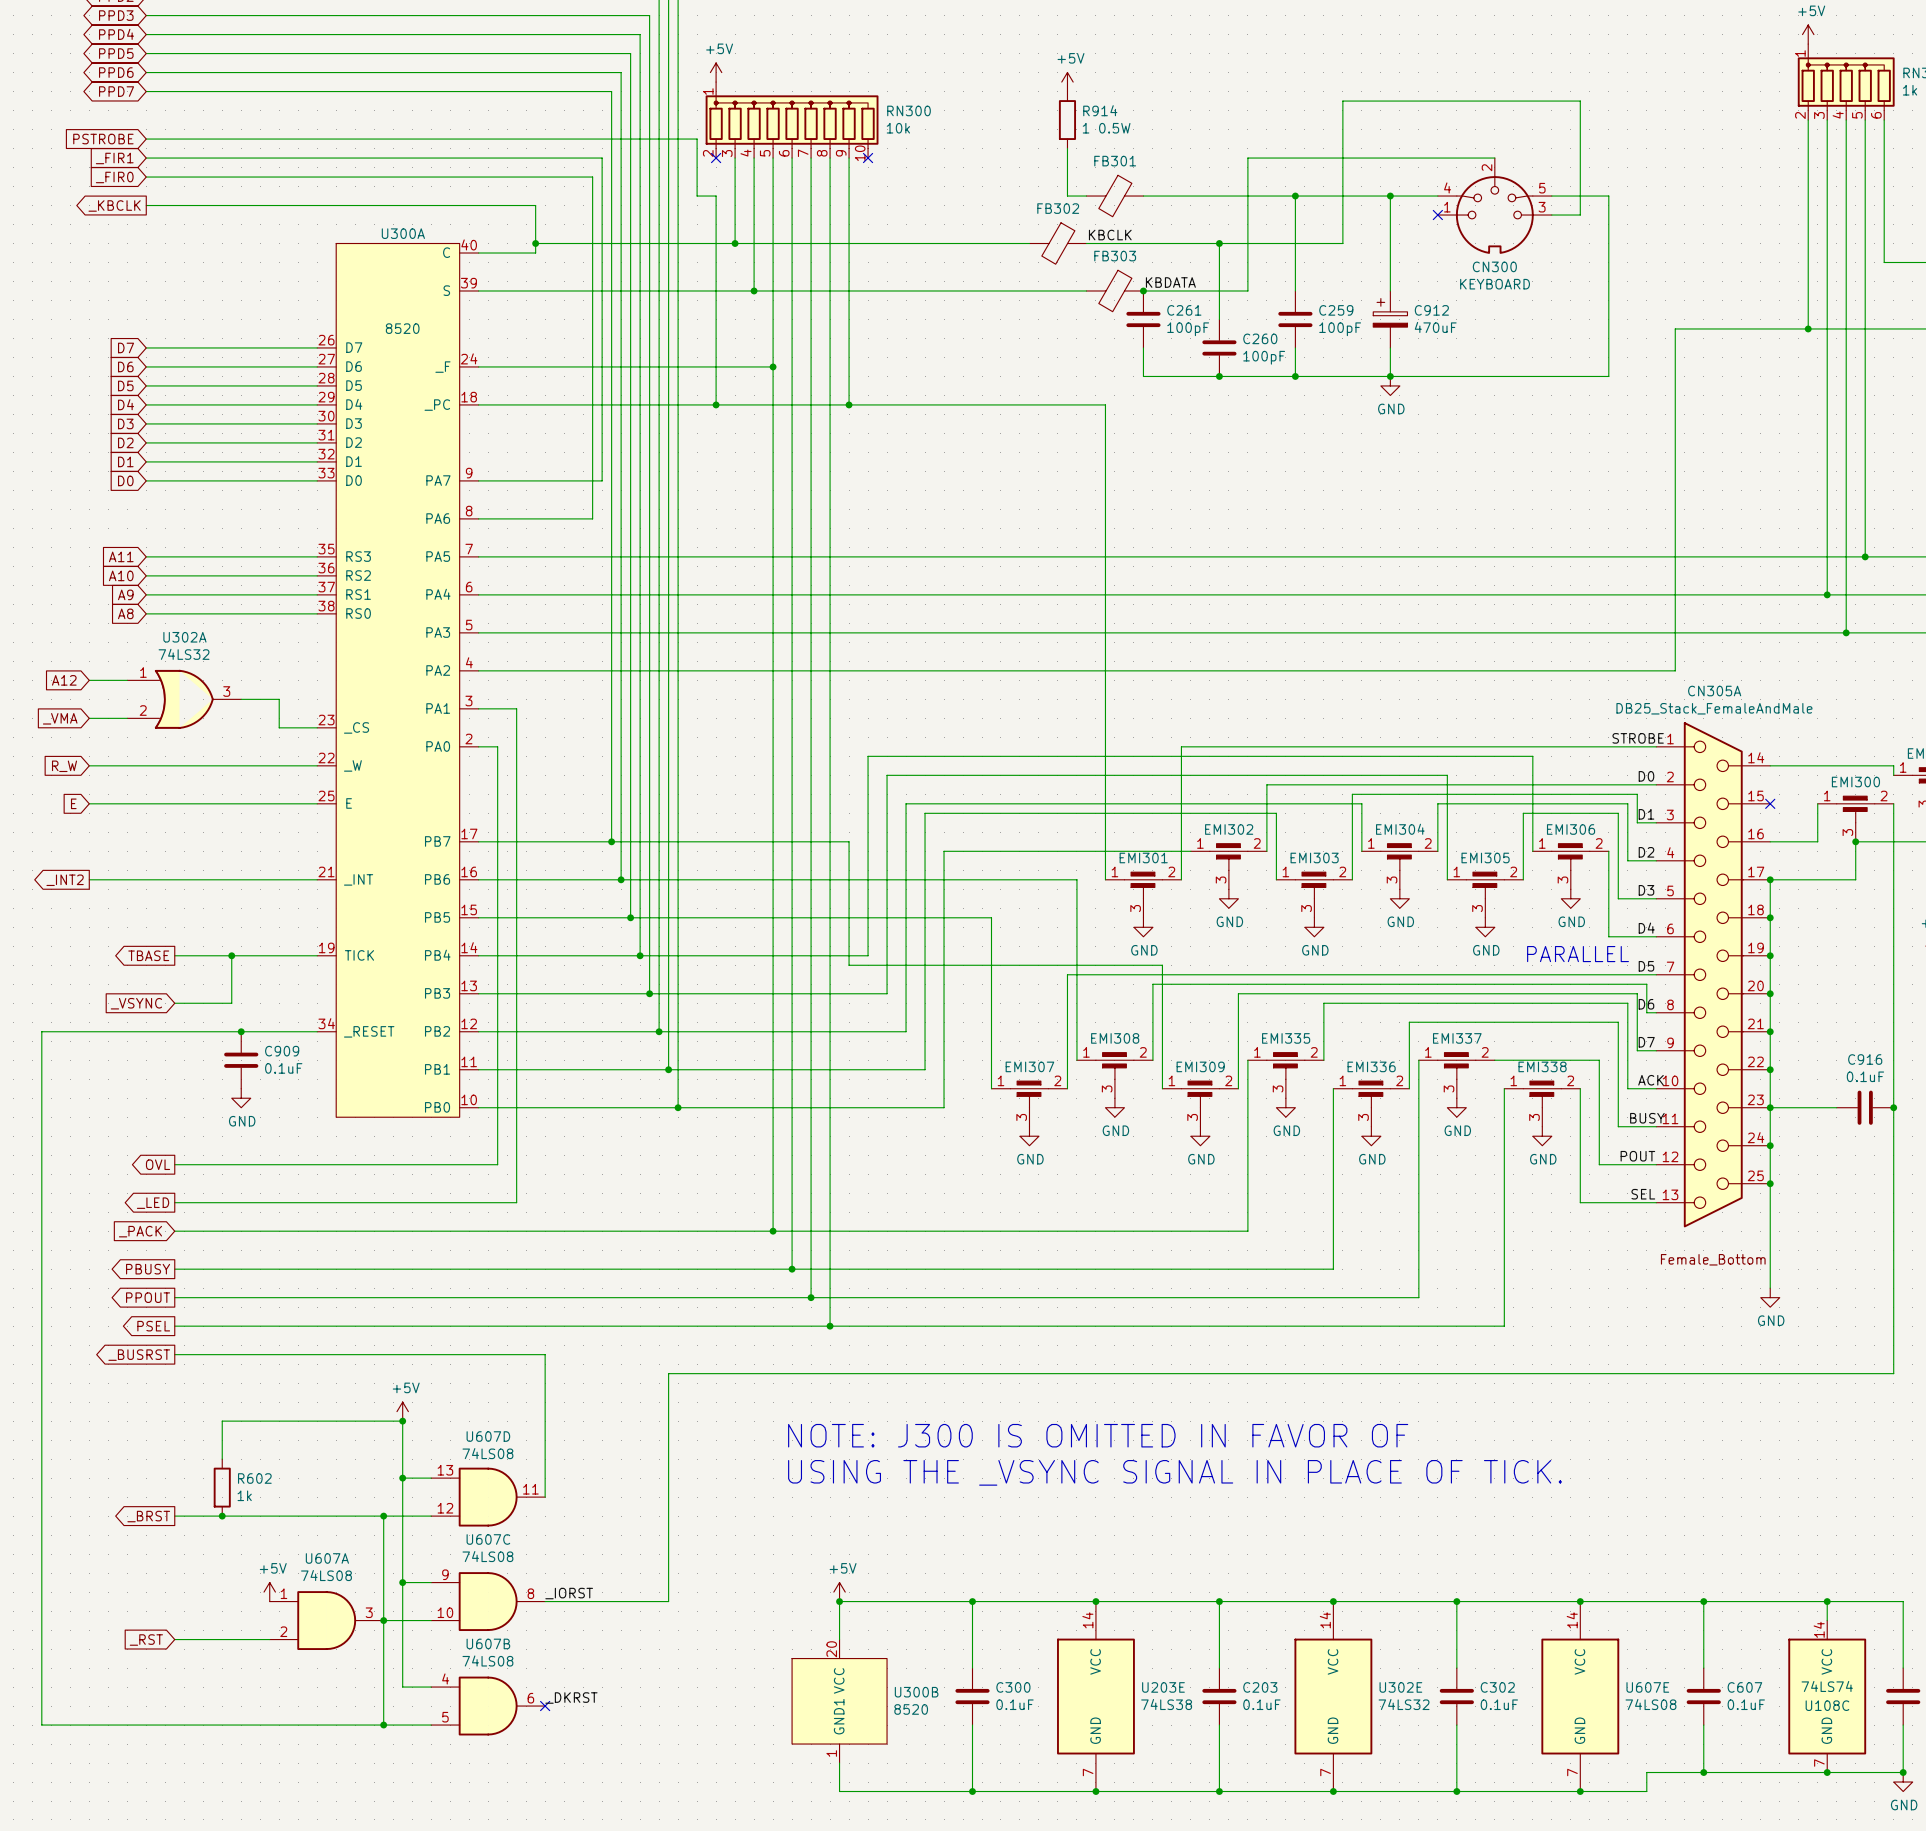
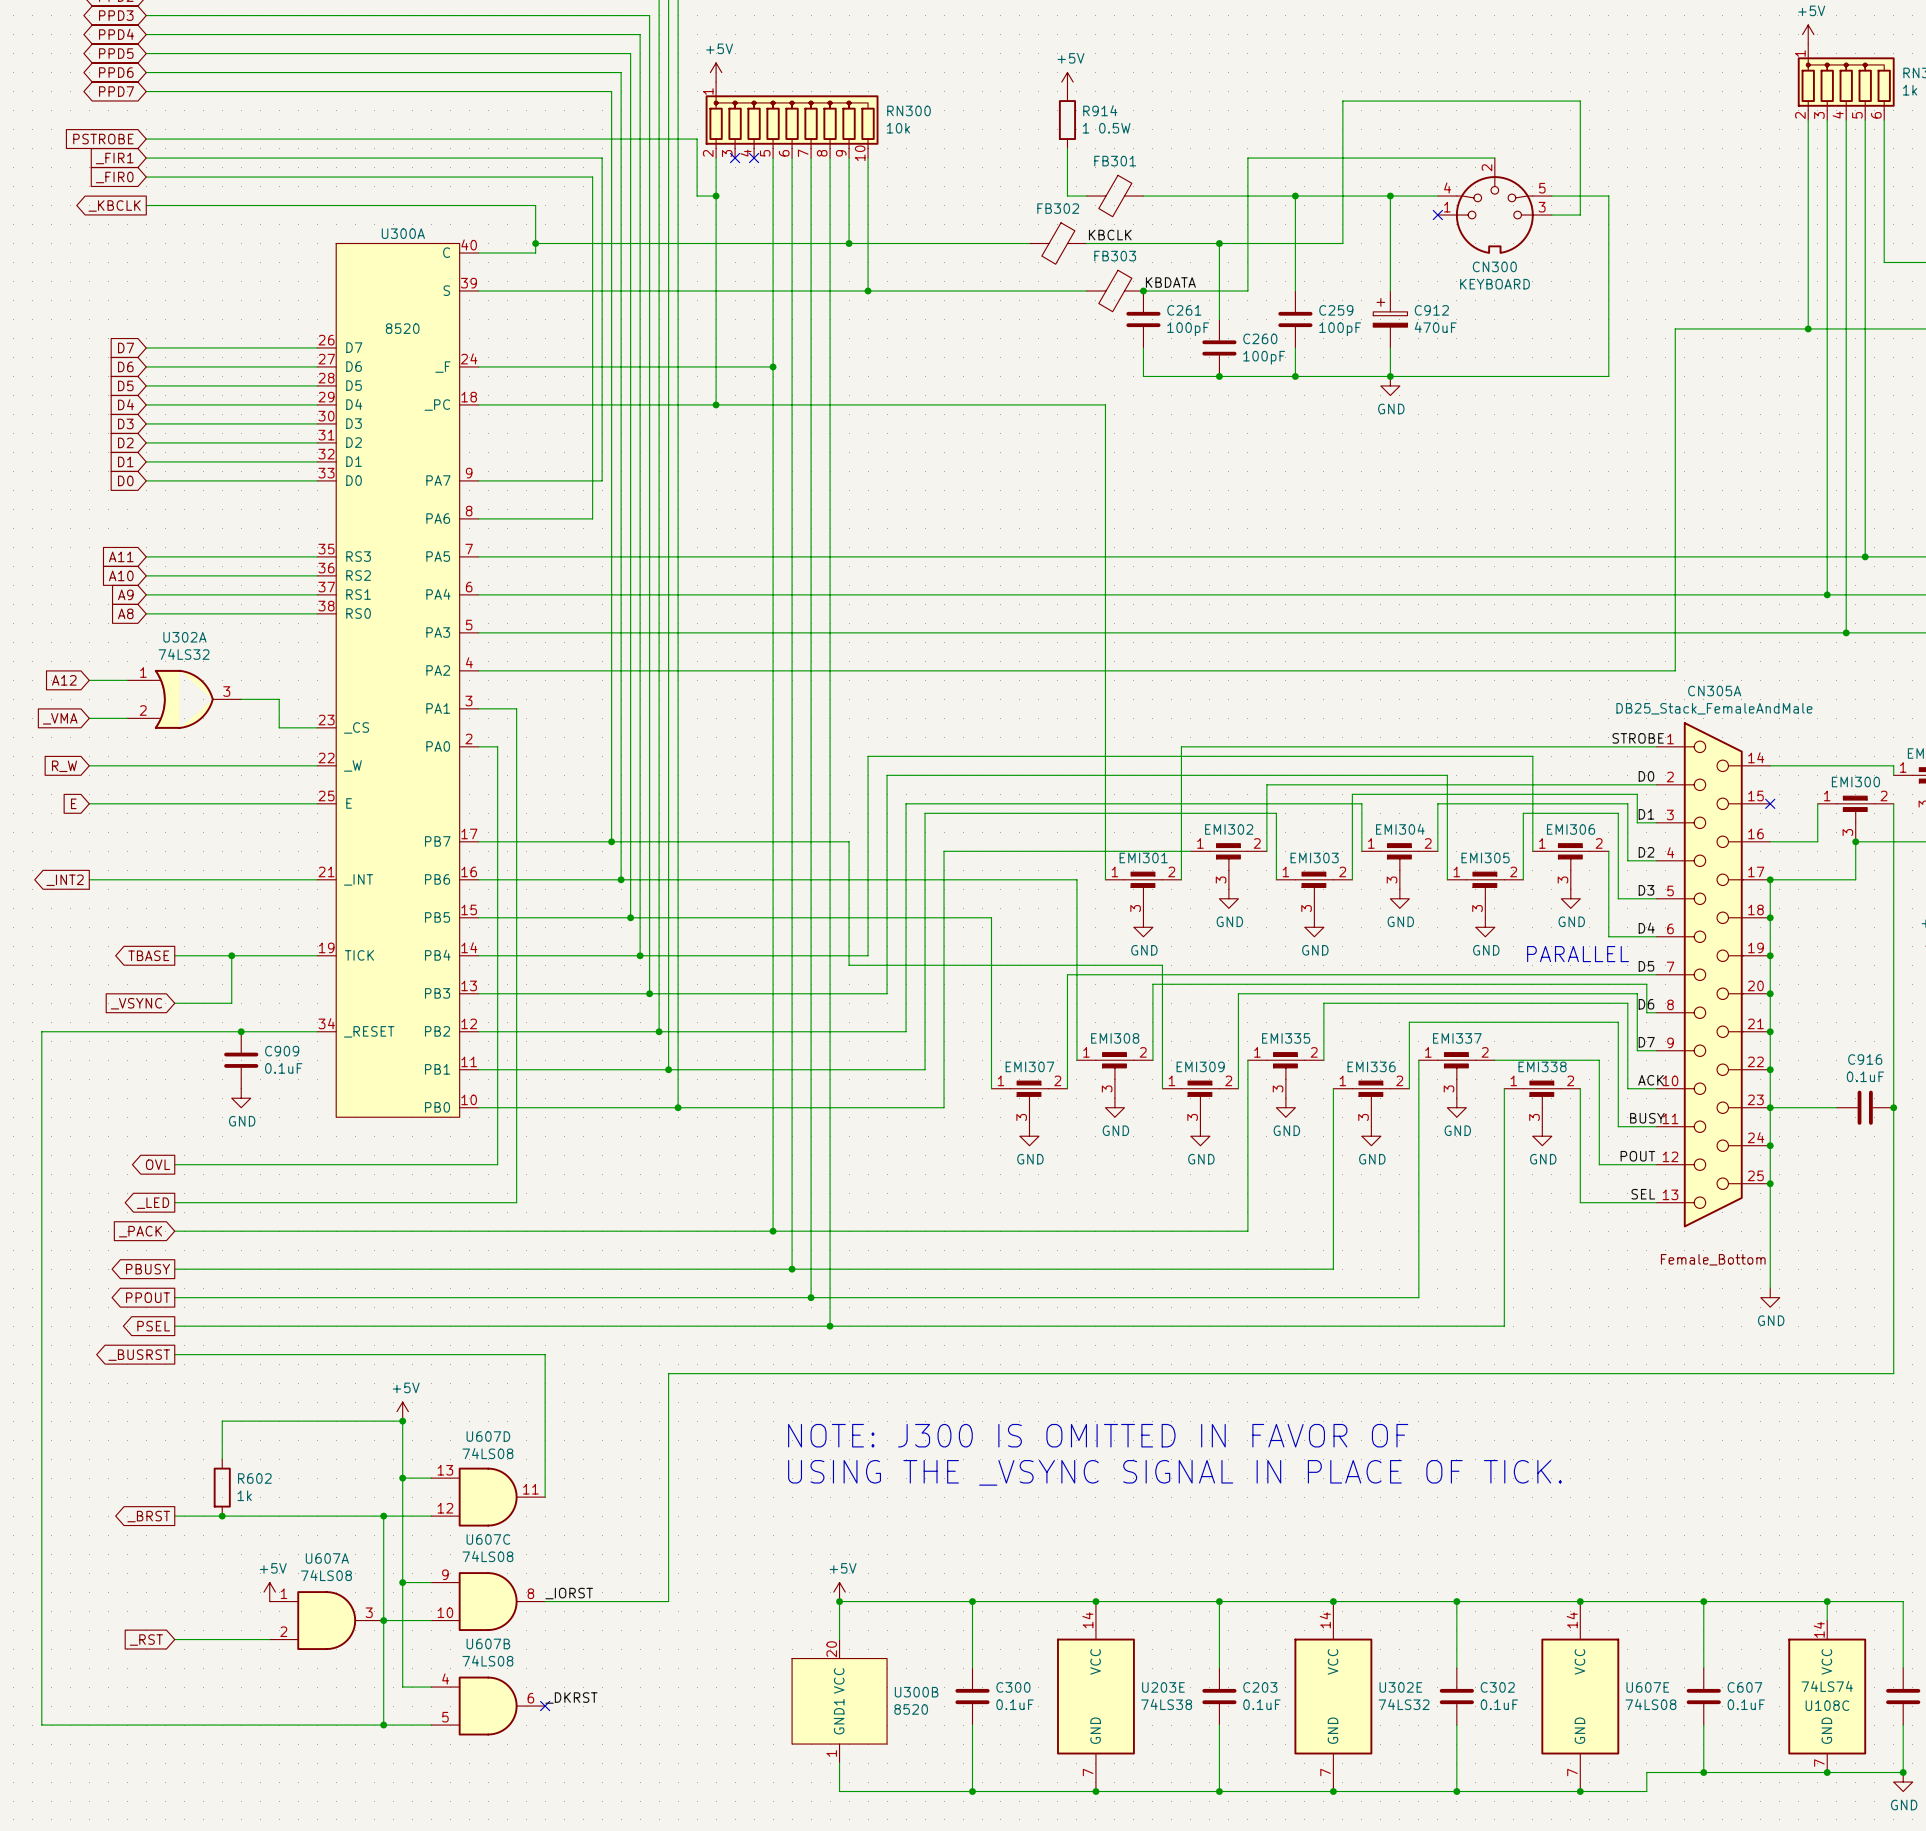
wire: none -> (716, 158) (716, 196)
no-connect mark: (716, 158) -> none
wire: (735, 158) (735, 243) -> none
no-connect mark: none -> (735, 158)
wire: (754, 158) (754, 290) -> (868, 158) (868, 290)
no-connect mark: none -> (754, 158)
no-connect mark: (868, 158) -> none
junction: none -> (716, 196)
junction: (735, 243) -> none
wire: (849, 243) (849, 404) -> none
junction: none -> (849, 243)
junction: (754, 290) -> none
junction: none -> (868, 290)
junction: (849, 404) -> none

